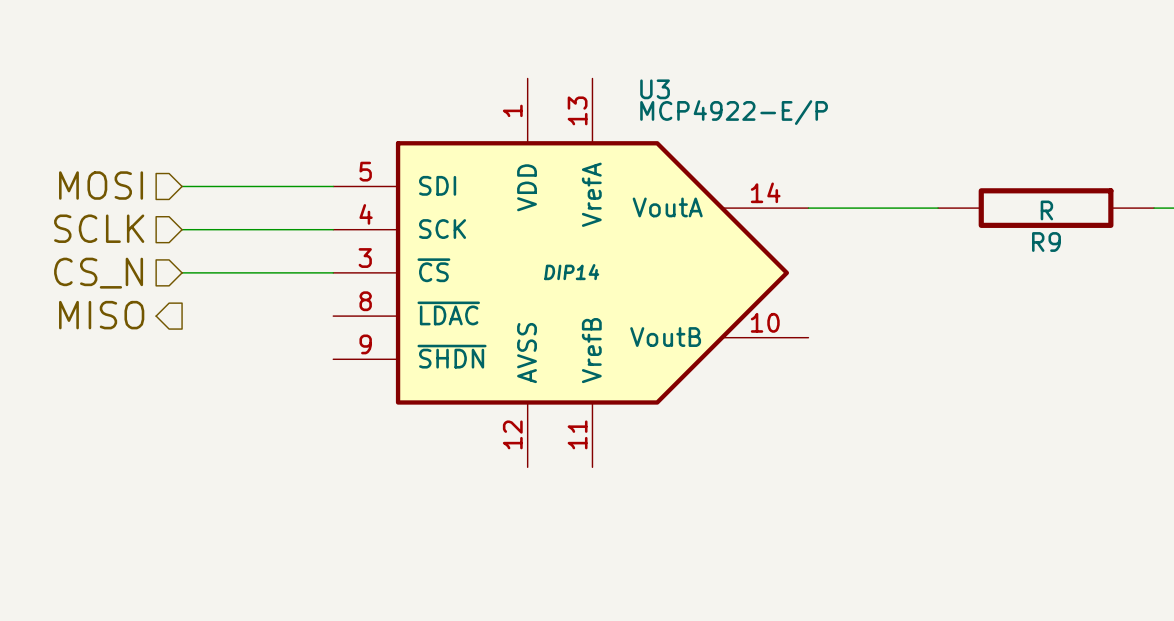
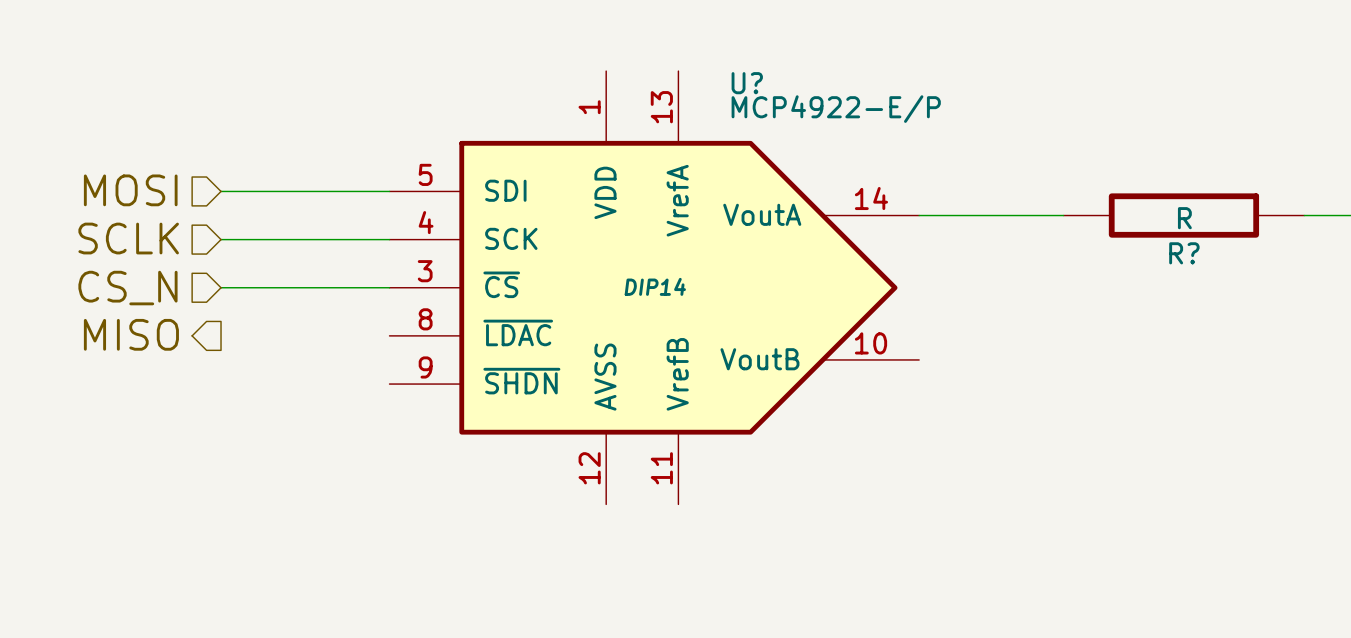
U3 name: U3 (655, 89) -> U? (747, 83)
R9 name: R9 (1046, 242) -> R? (1184, 253)

